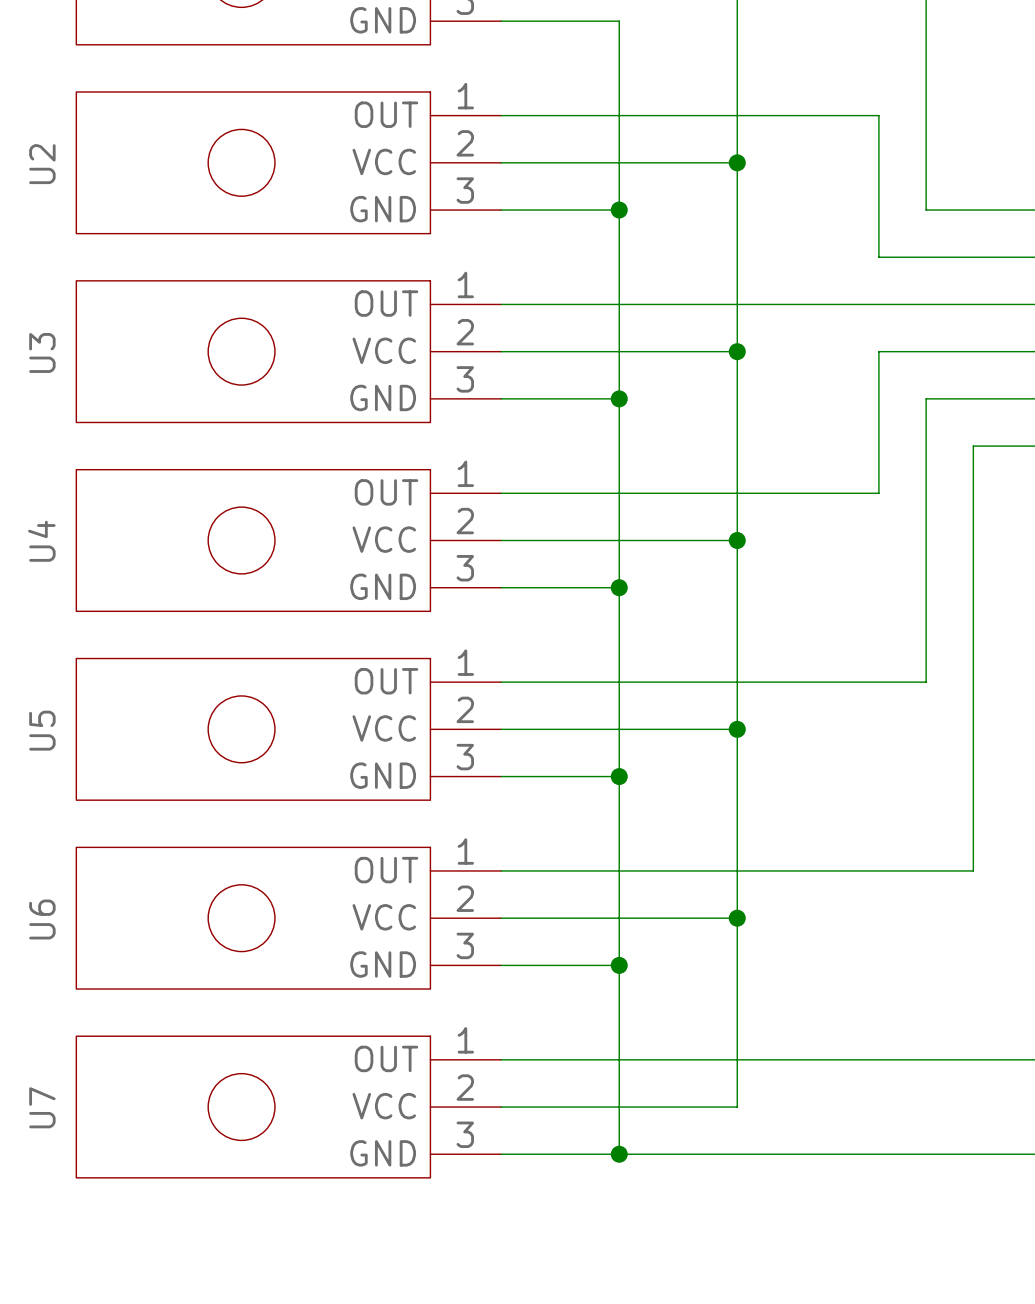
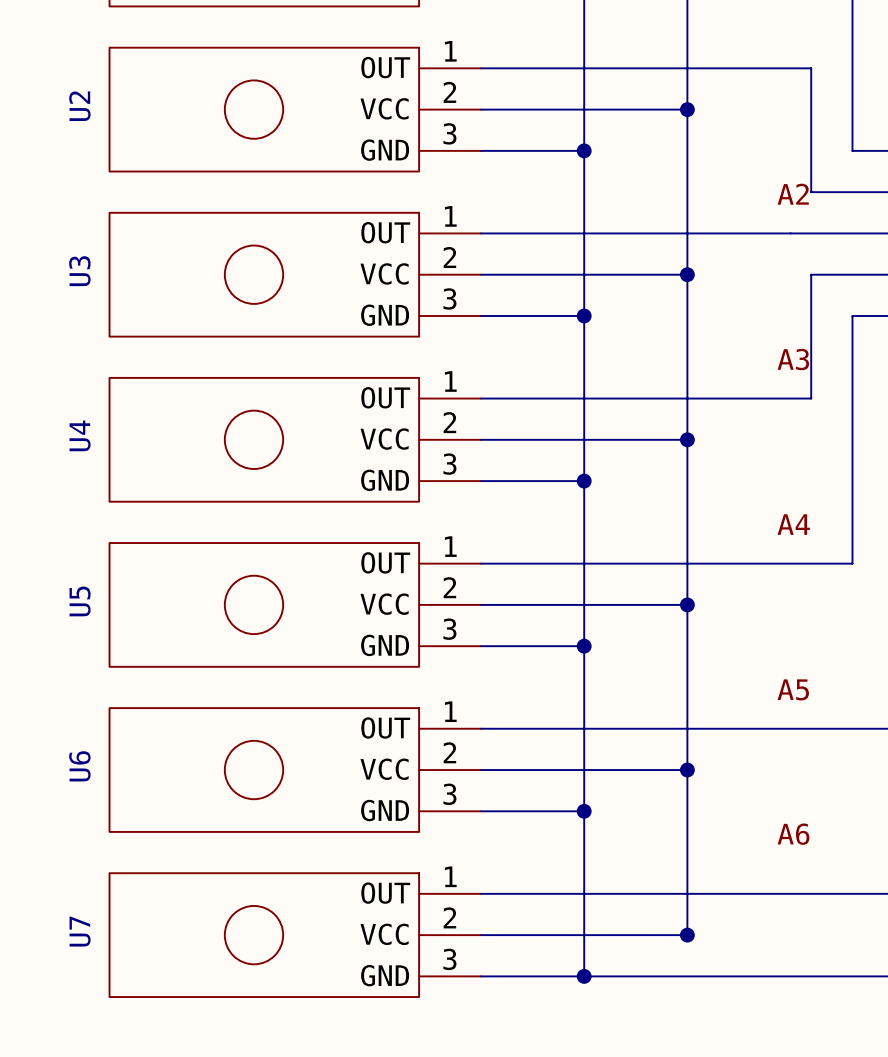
label: none -> A2 (793, 194)
label: none -> A3 (793, 359)
label: none -> A4 (793, 524)
label: none -> A5 (793, 689)
label: none -> A6 (793, 834)
junction: none -> (687, 935)

